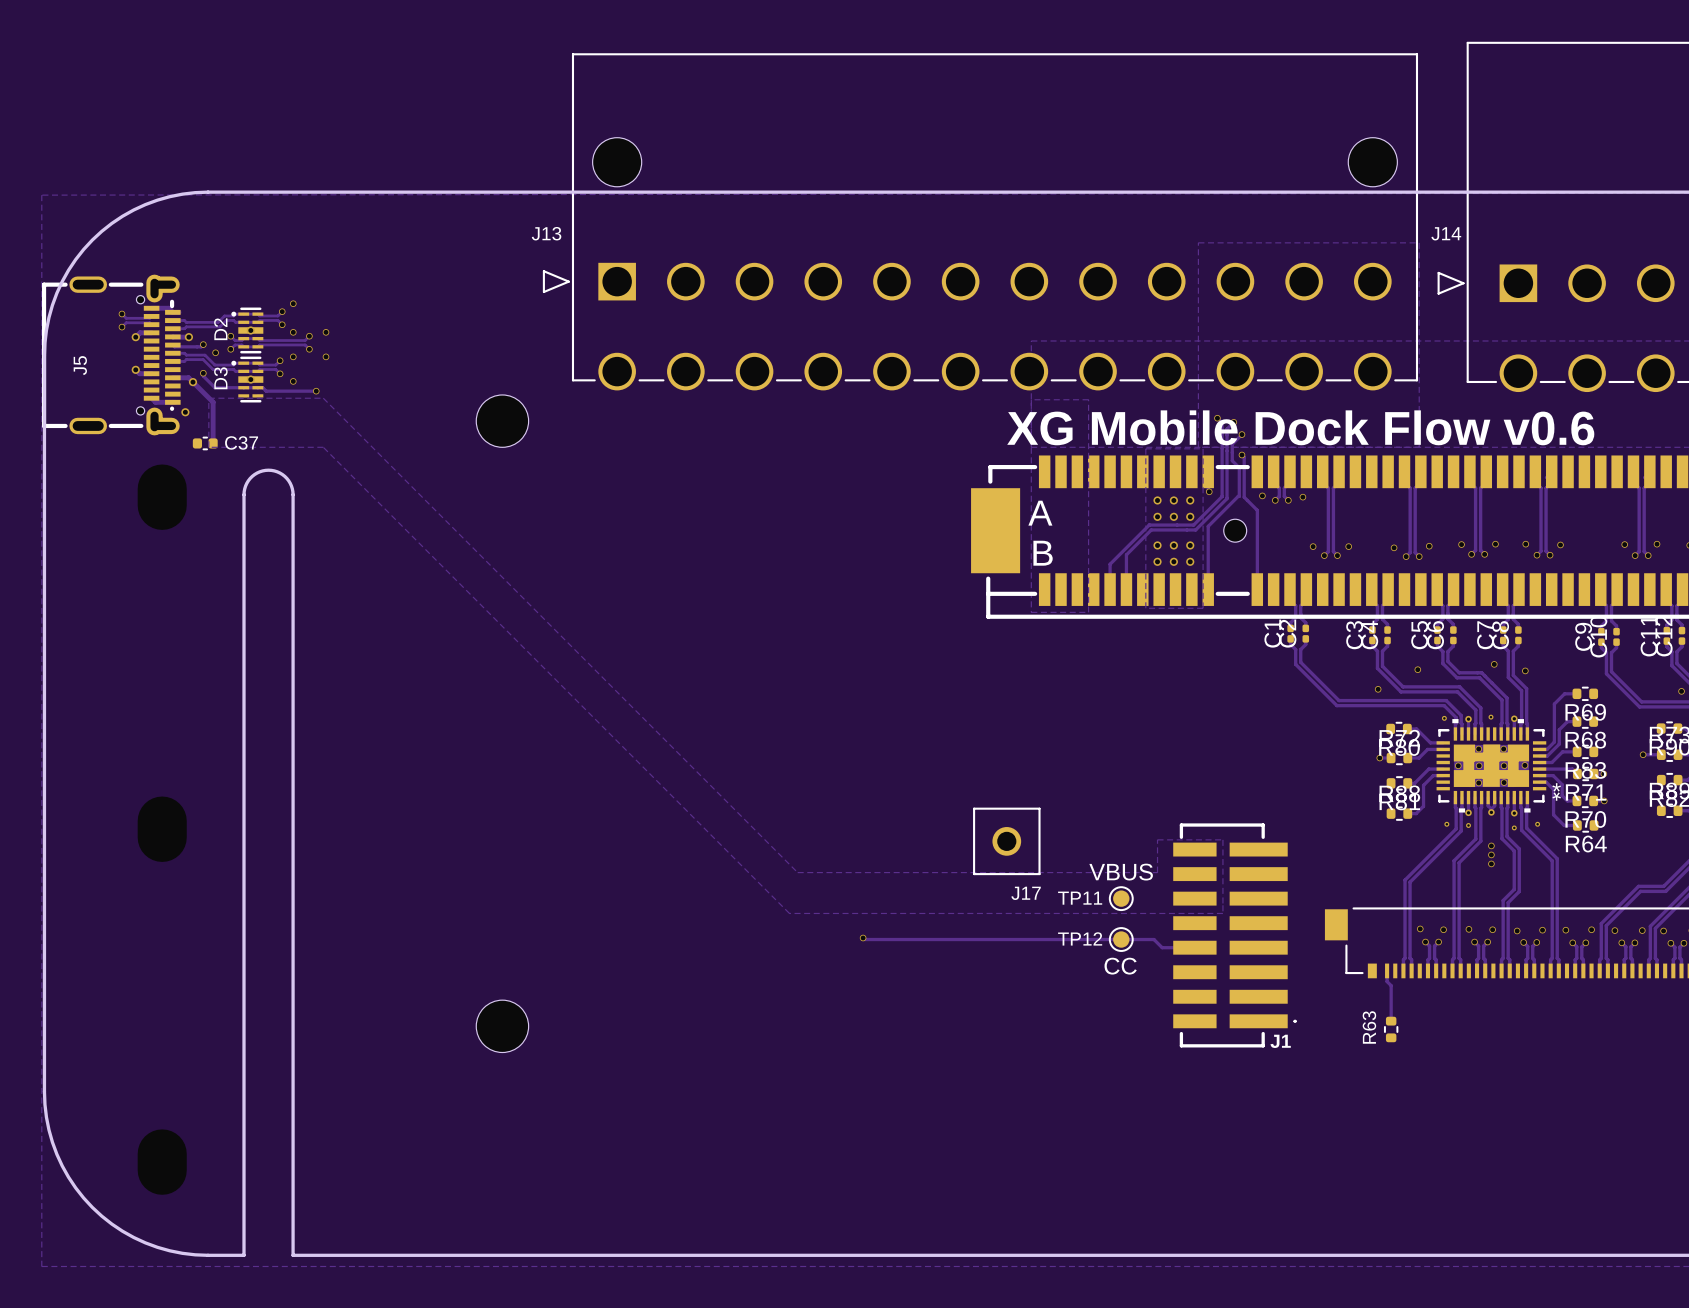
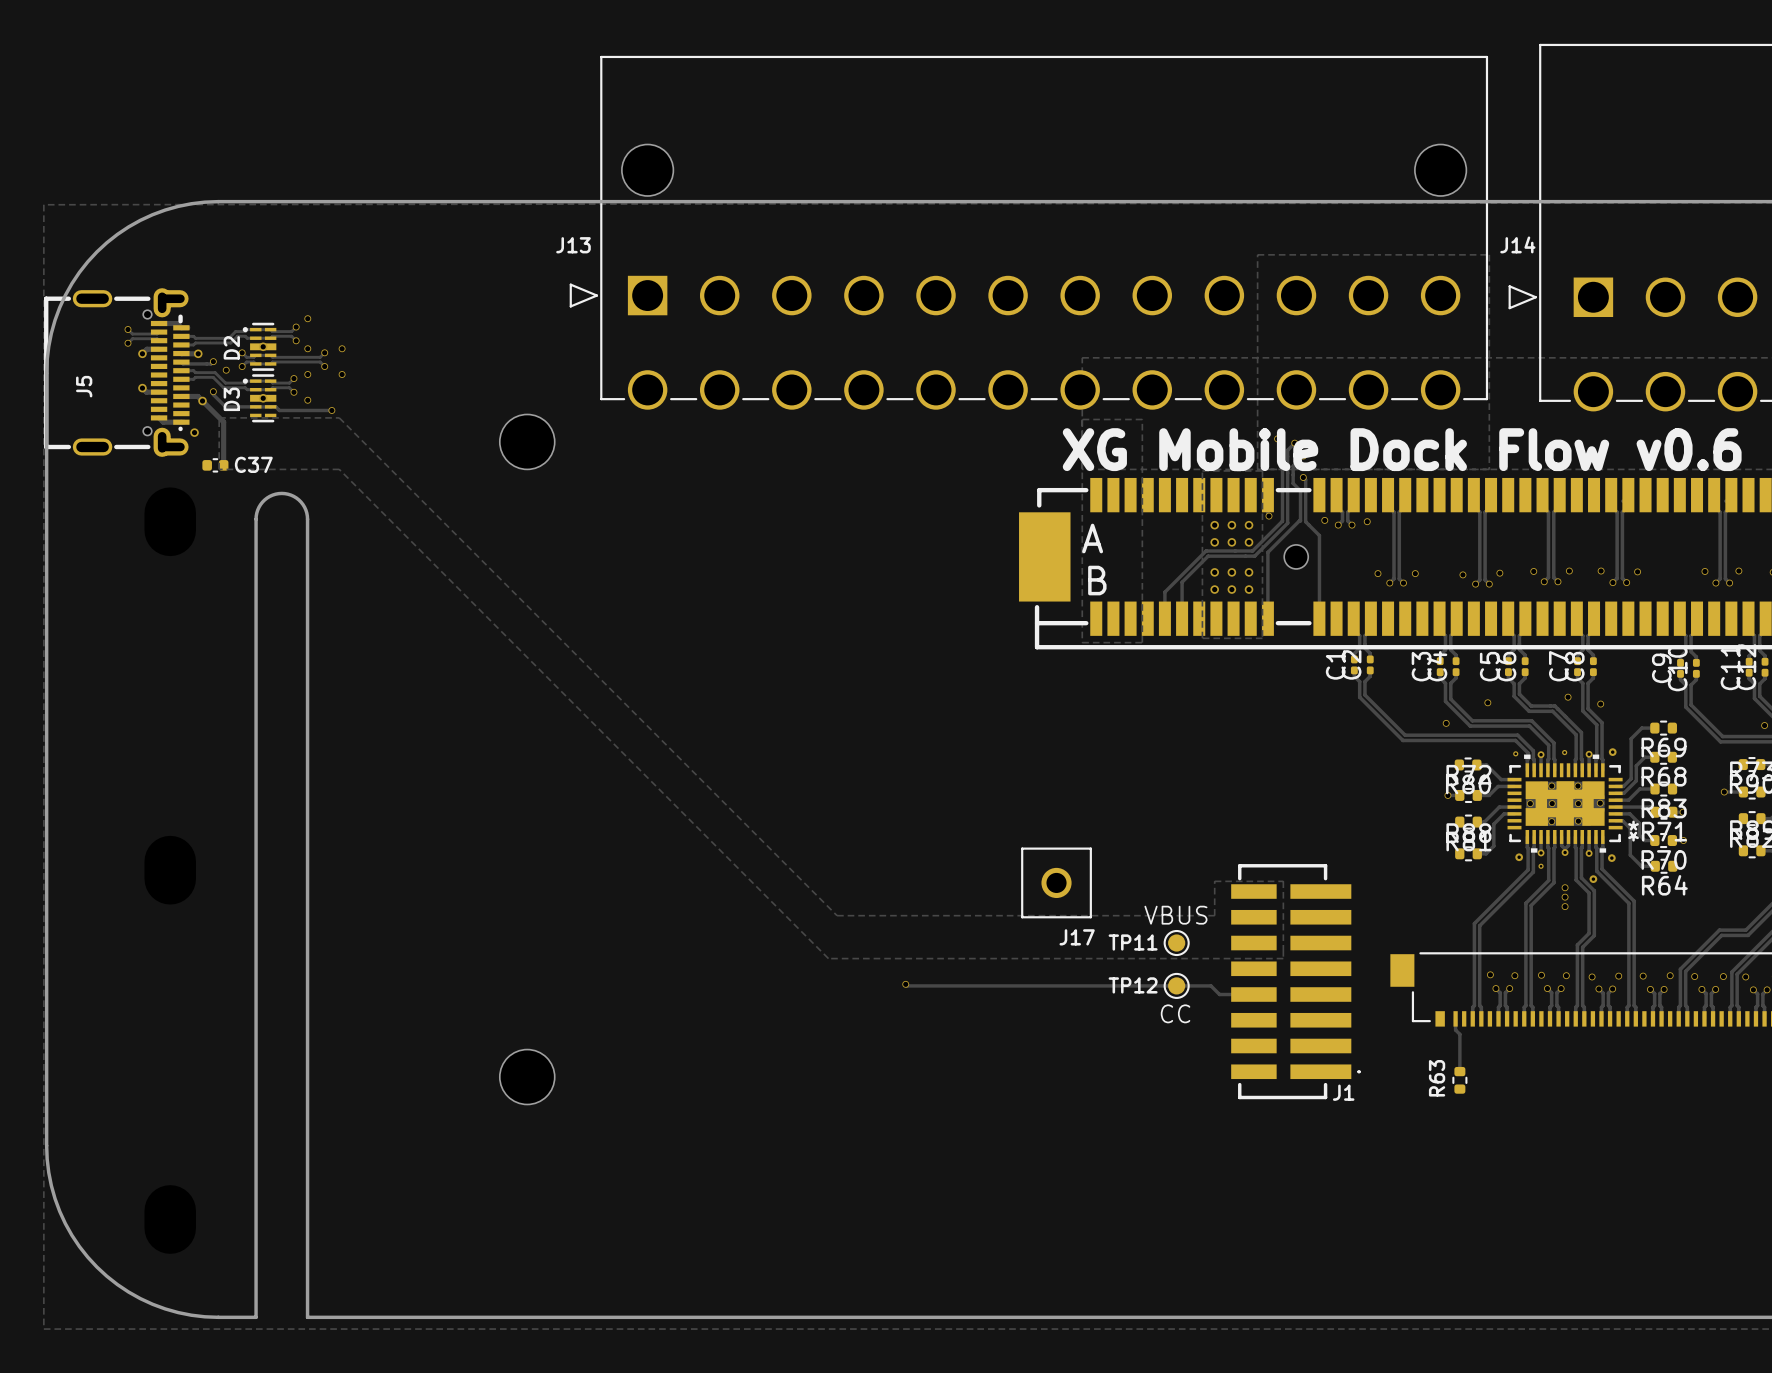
via: none -> (1612, 752)
via: none -> (1519, 857)
via: none -> (1611, 858)
via: (1446, 824) -> none
via: (1537, 824) -> none
via: (1514, 827) -> none
via: none -> (1593, 879)

